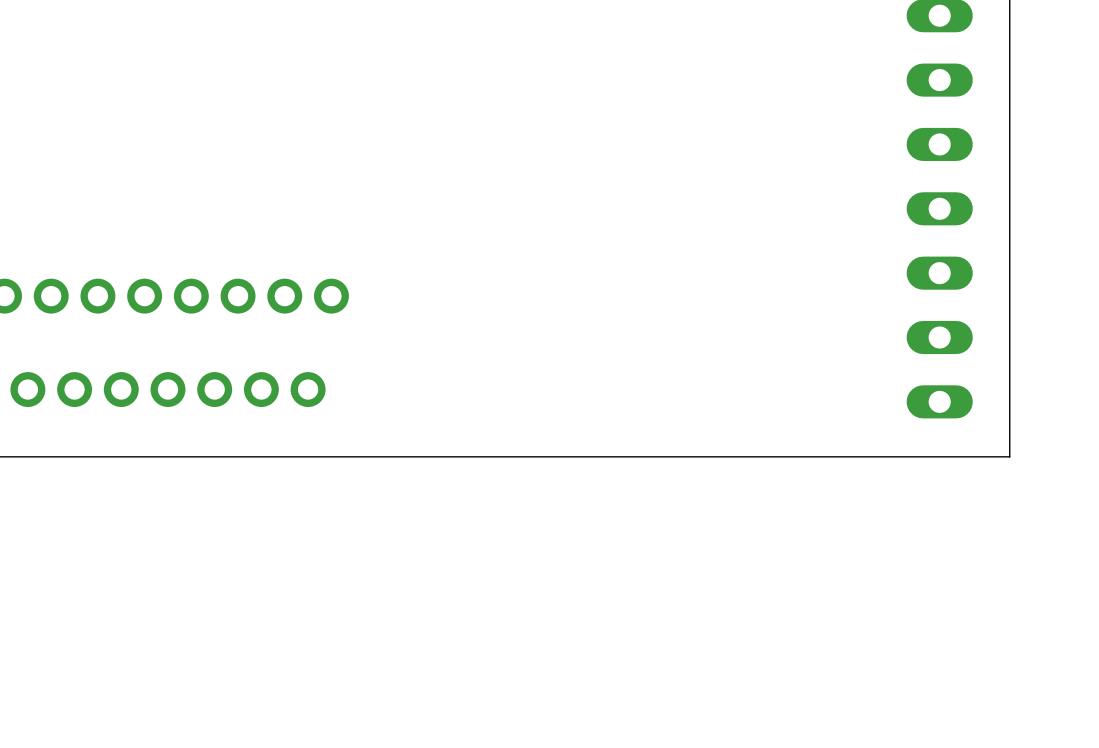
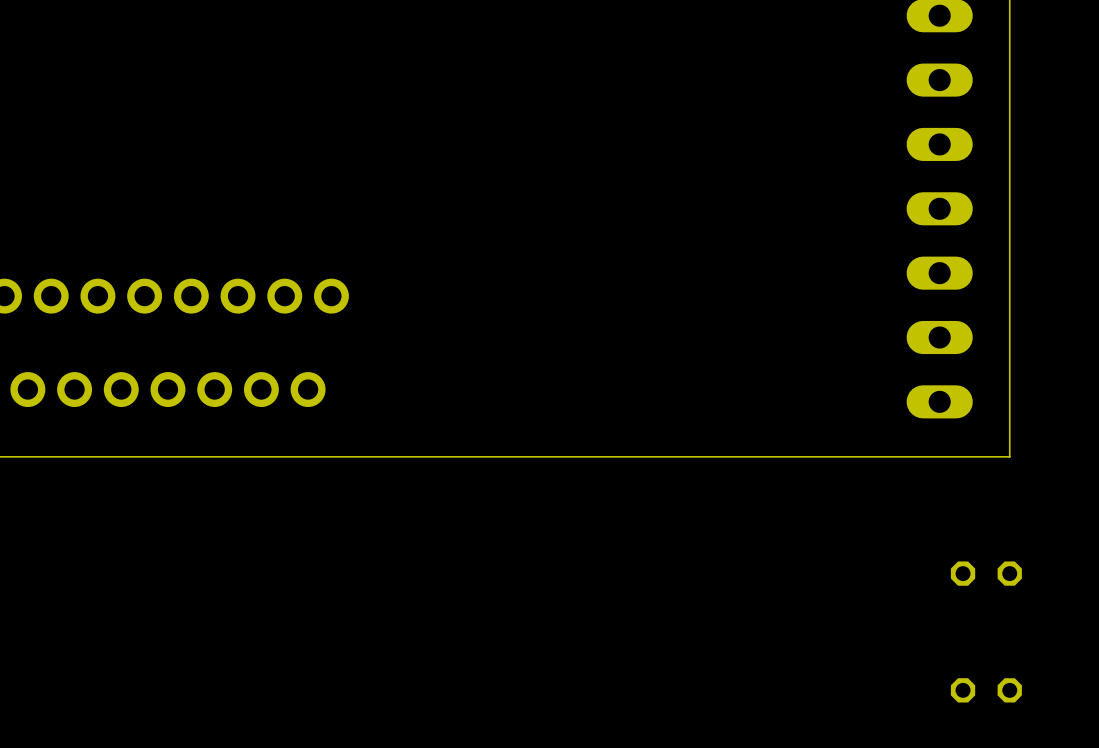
part: none -> (986, 573)
part: none -> (986, 690)

